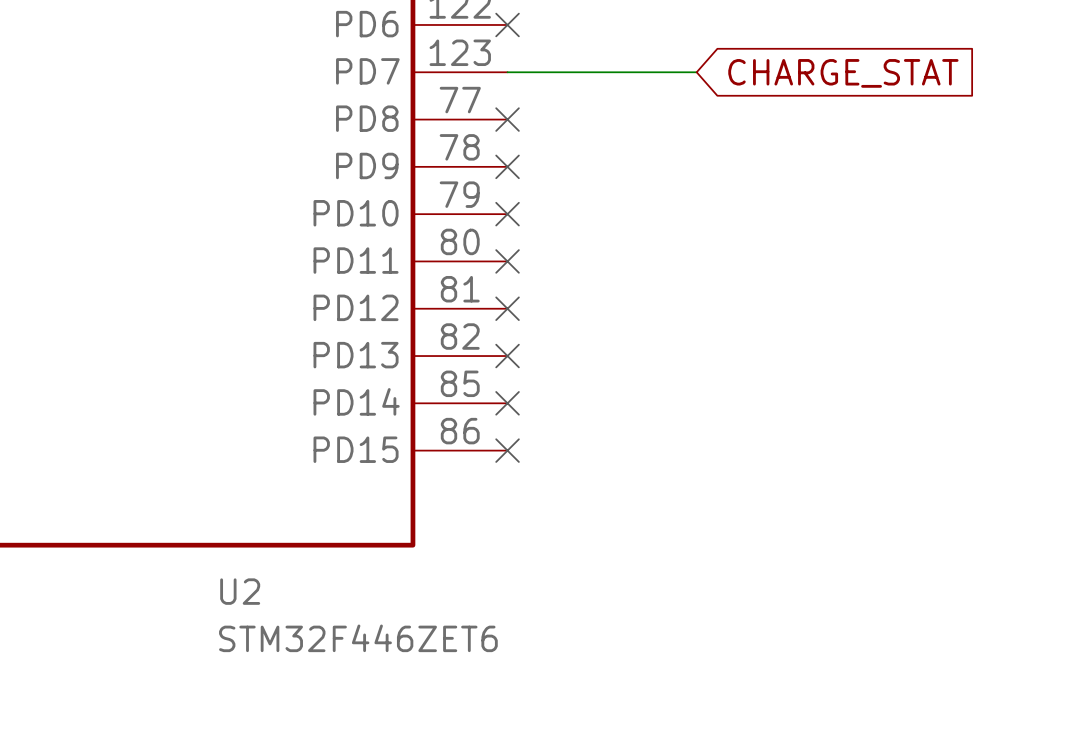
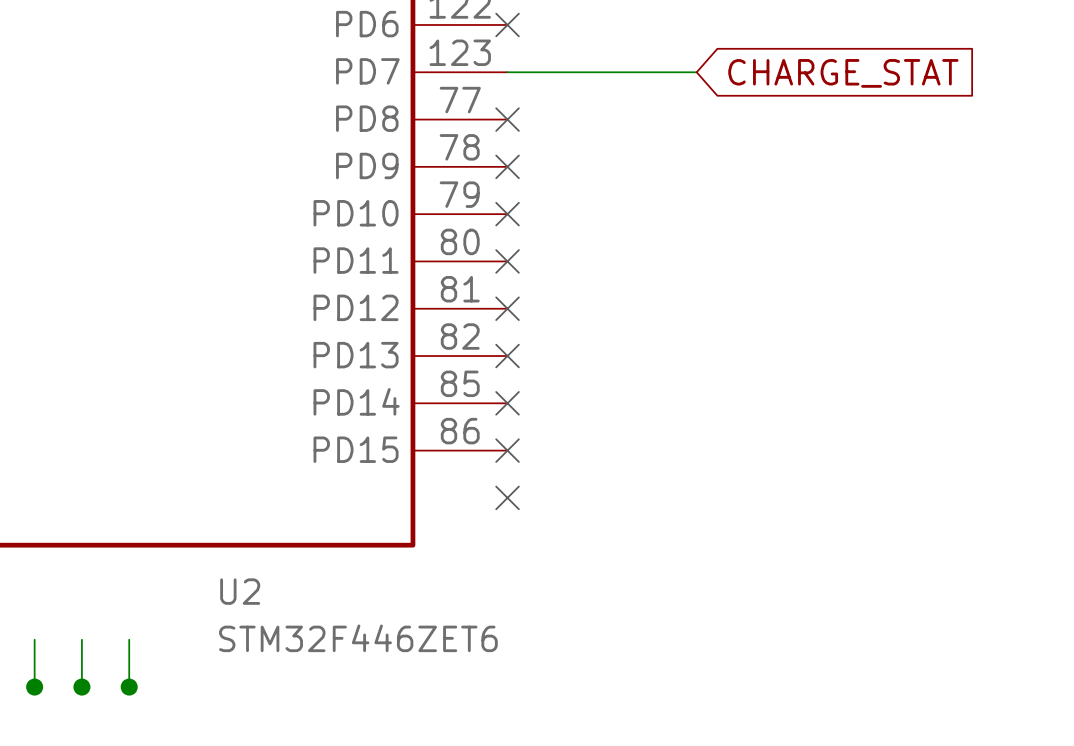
no-connect mark: none -> (507, 497)
wire: none -> (34, 639) (34, 687)
wire: none -> (81, 639) (81, 687)
wire: none -> (129, 639) (129, 687)
junction: none -> (34, 687)
junction: none -> (81, 687)
junction: none -> (129, 687)

